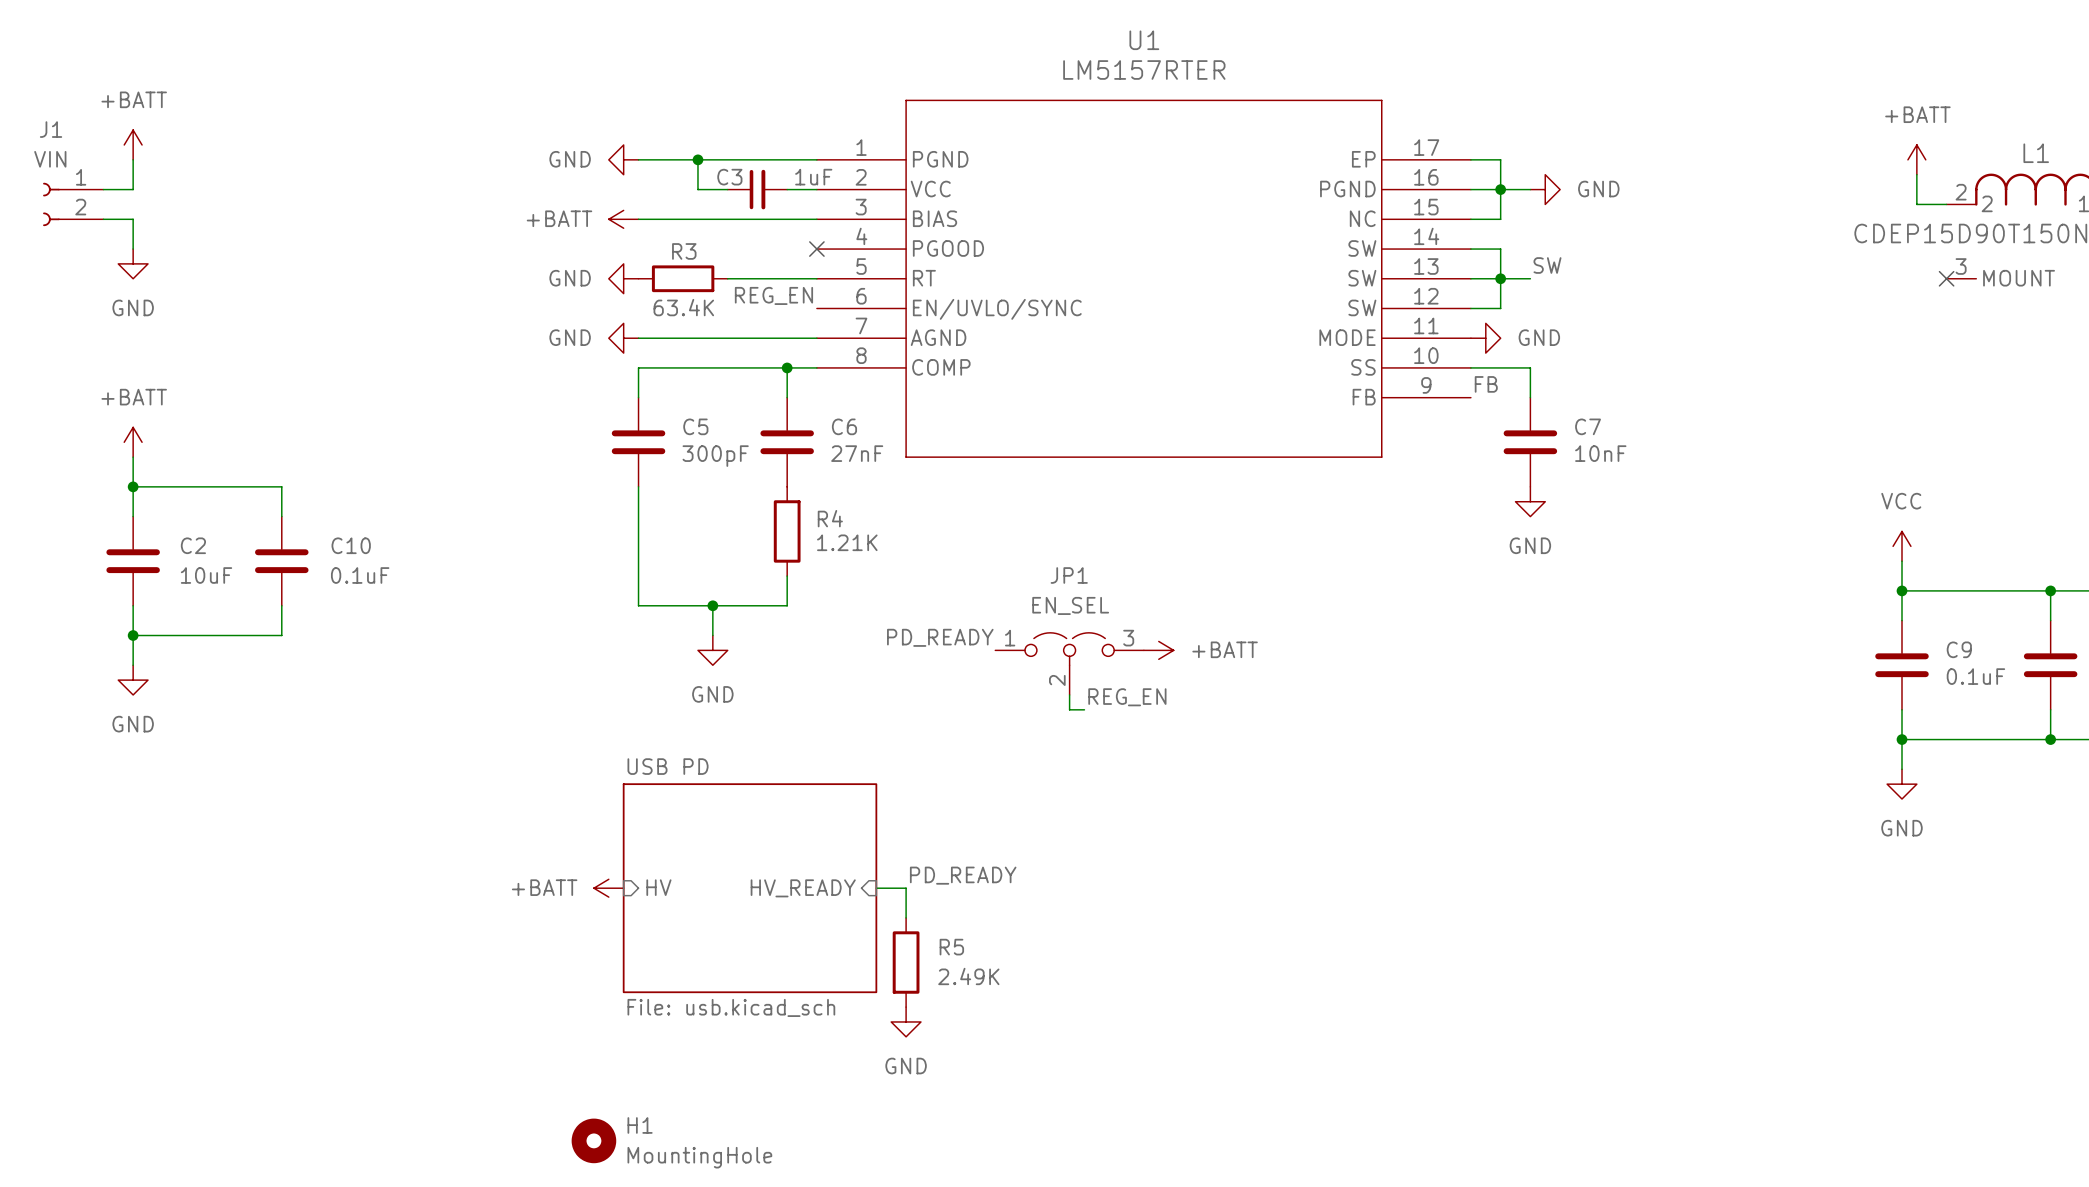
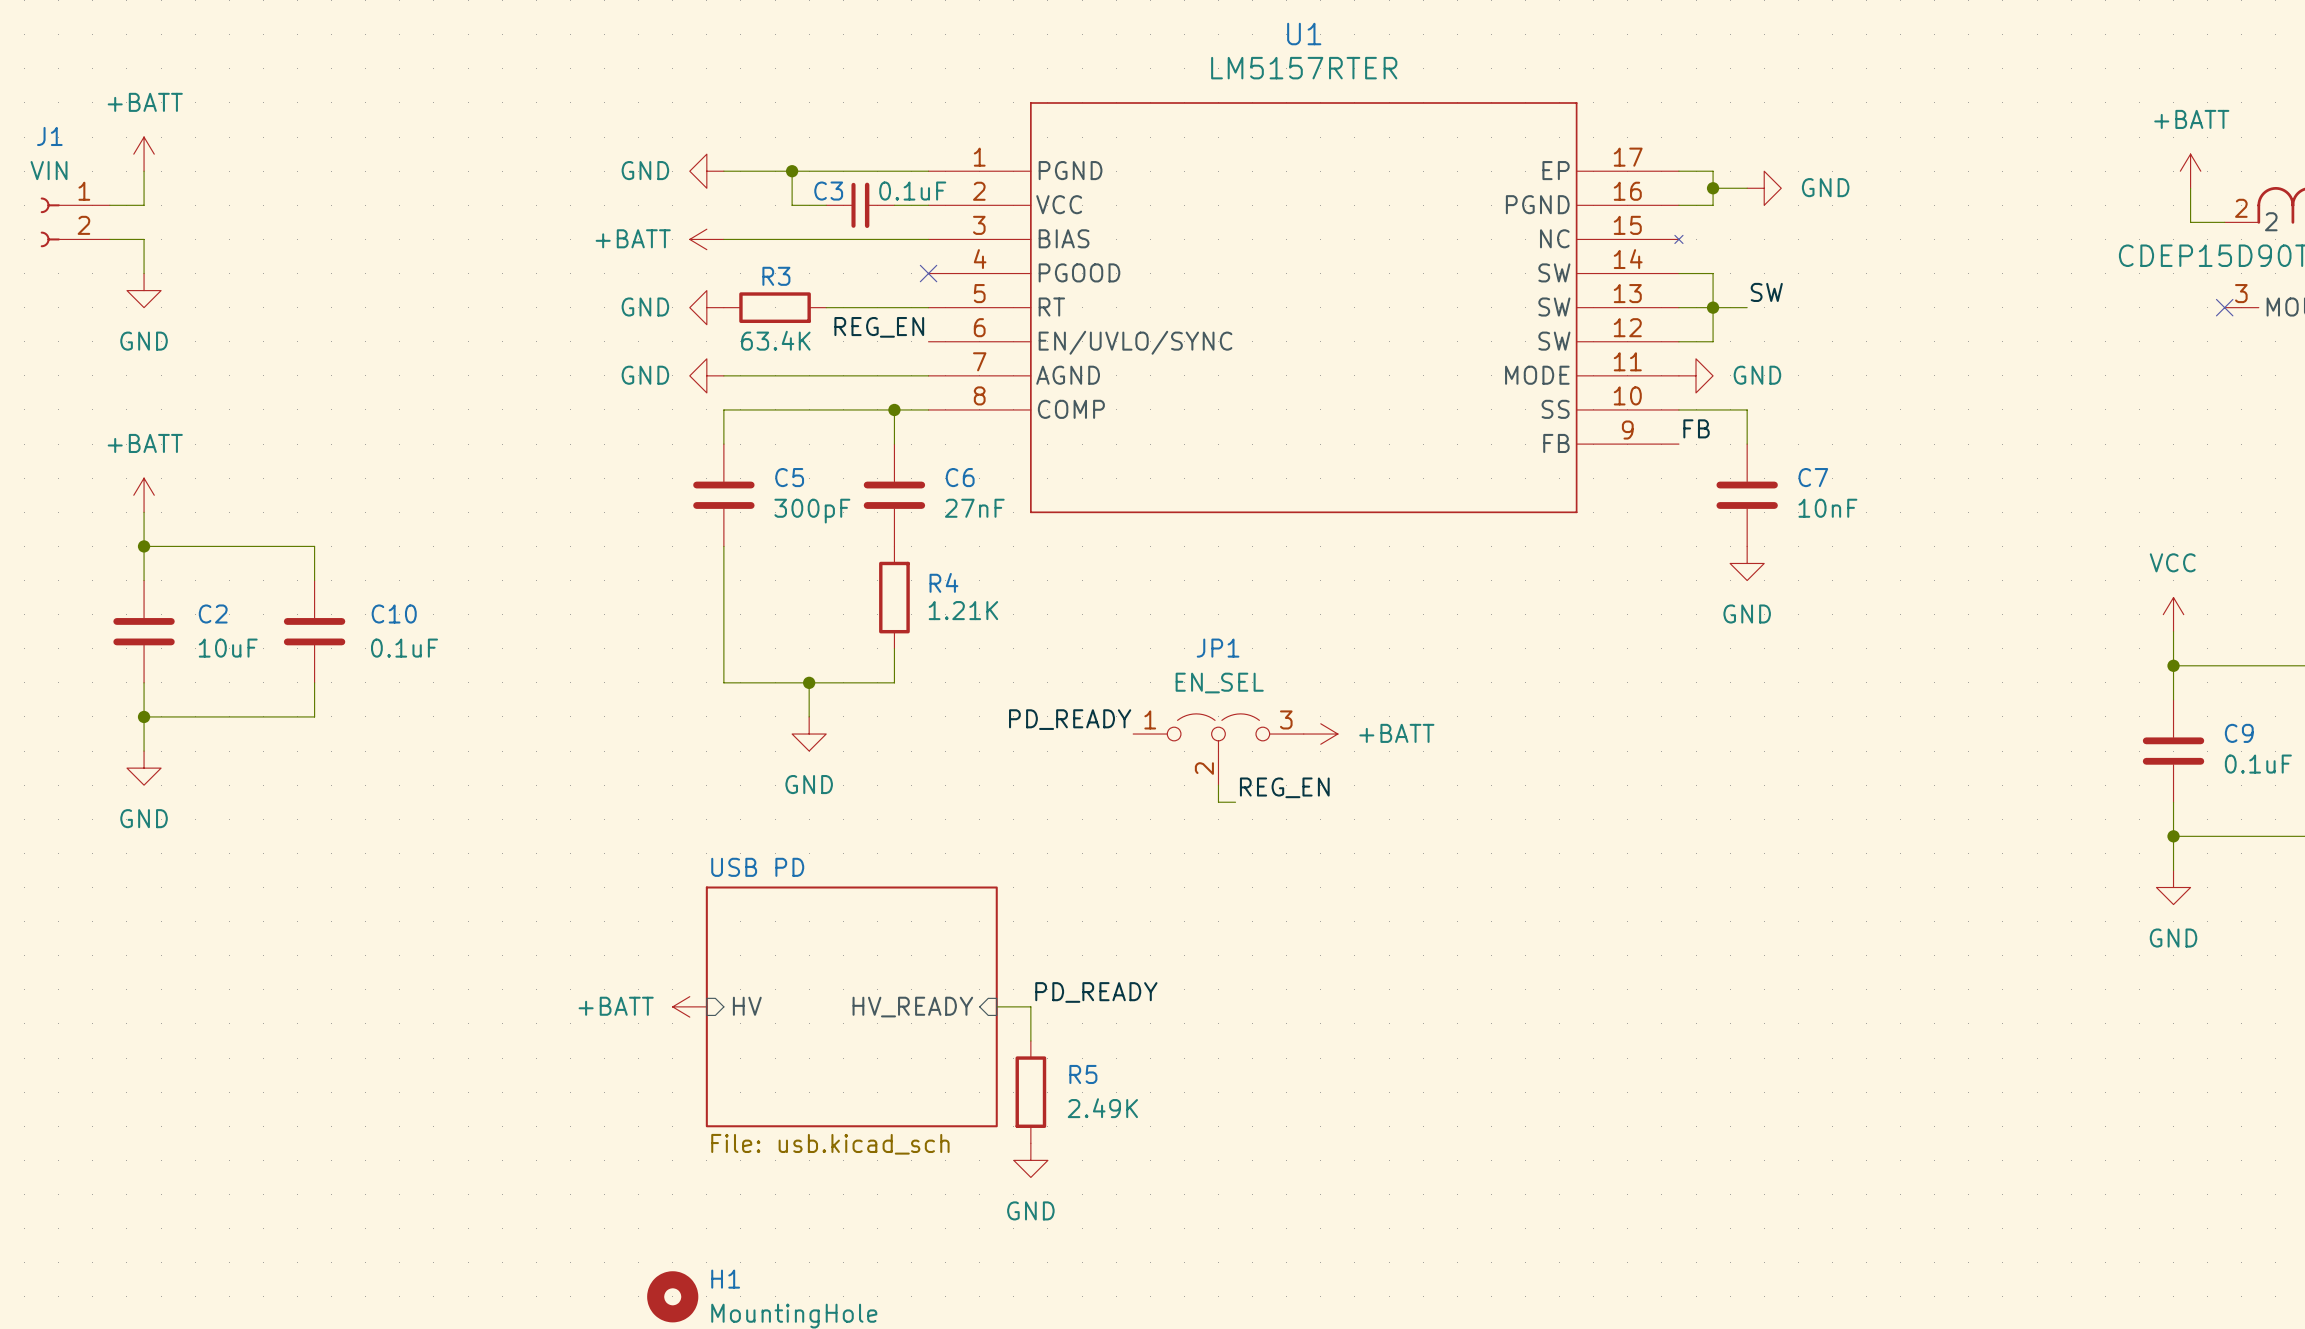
U1 symbol: [816, 99, 1471, 458] -> [928, 102, 1683, 514]
wire: none -> (1713, 188) (1747, 188)
C3 value: 1uF (813, 177) -> 0.1uF (912, 191)
junction position: (1500, 189) -> (1713, 188)
wire: (1530, 189) (1500, 189) (1500, 219) (1470, 219) -> none
power symbol position: GND (1545, 189) -> GND (1764, 188)

